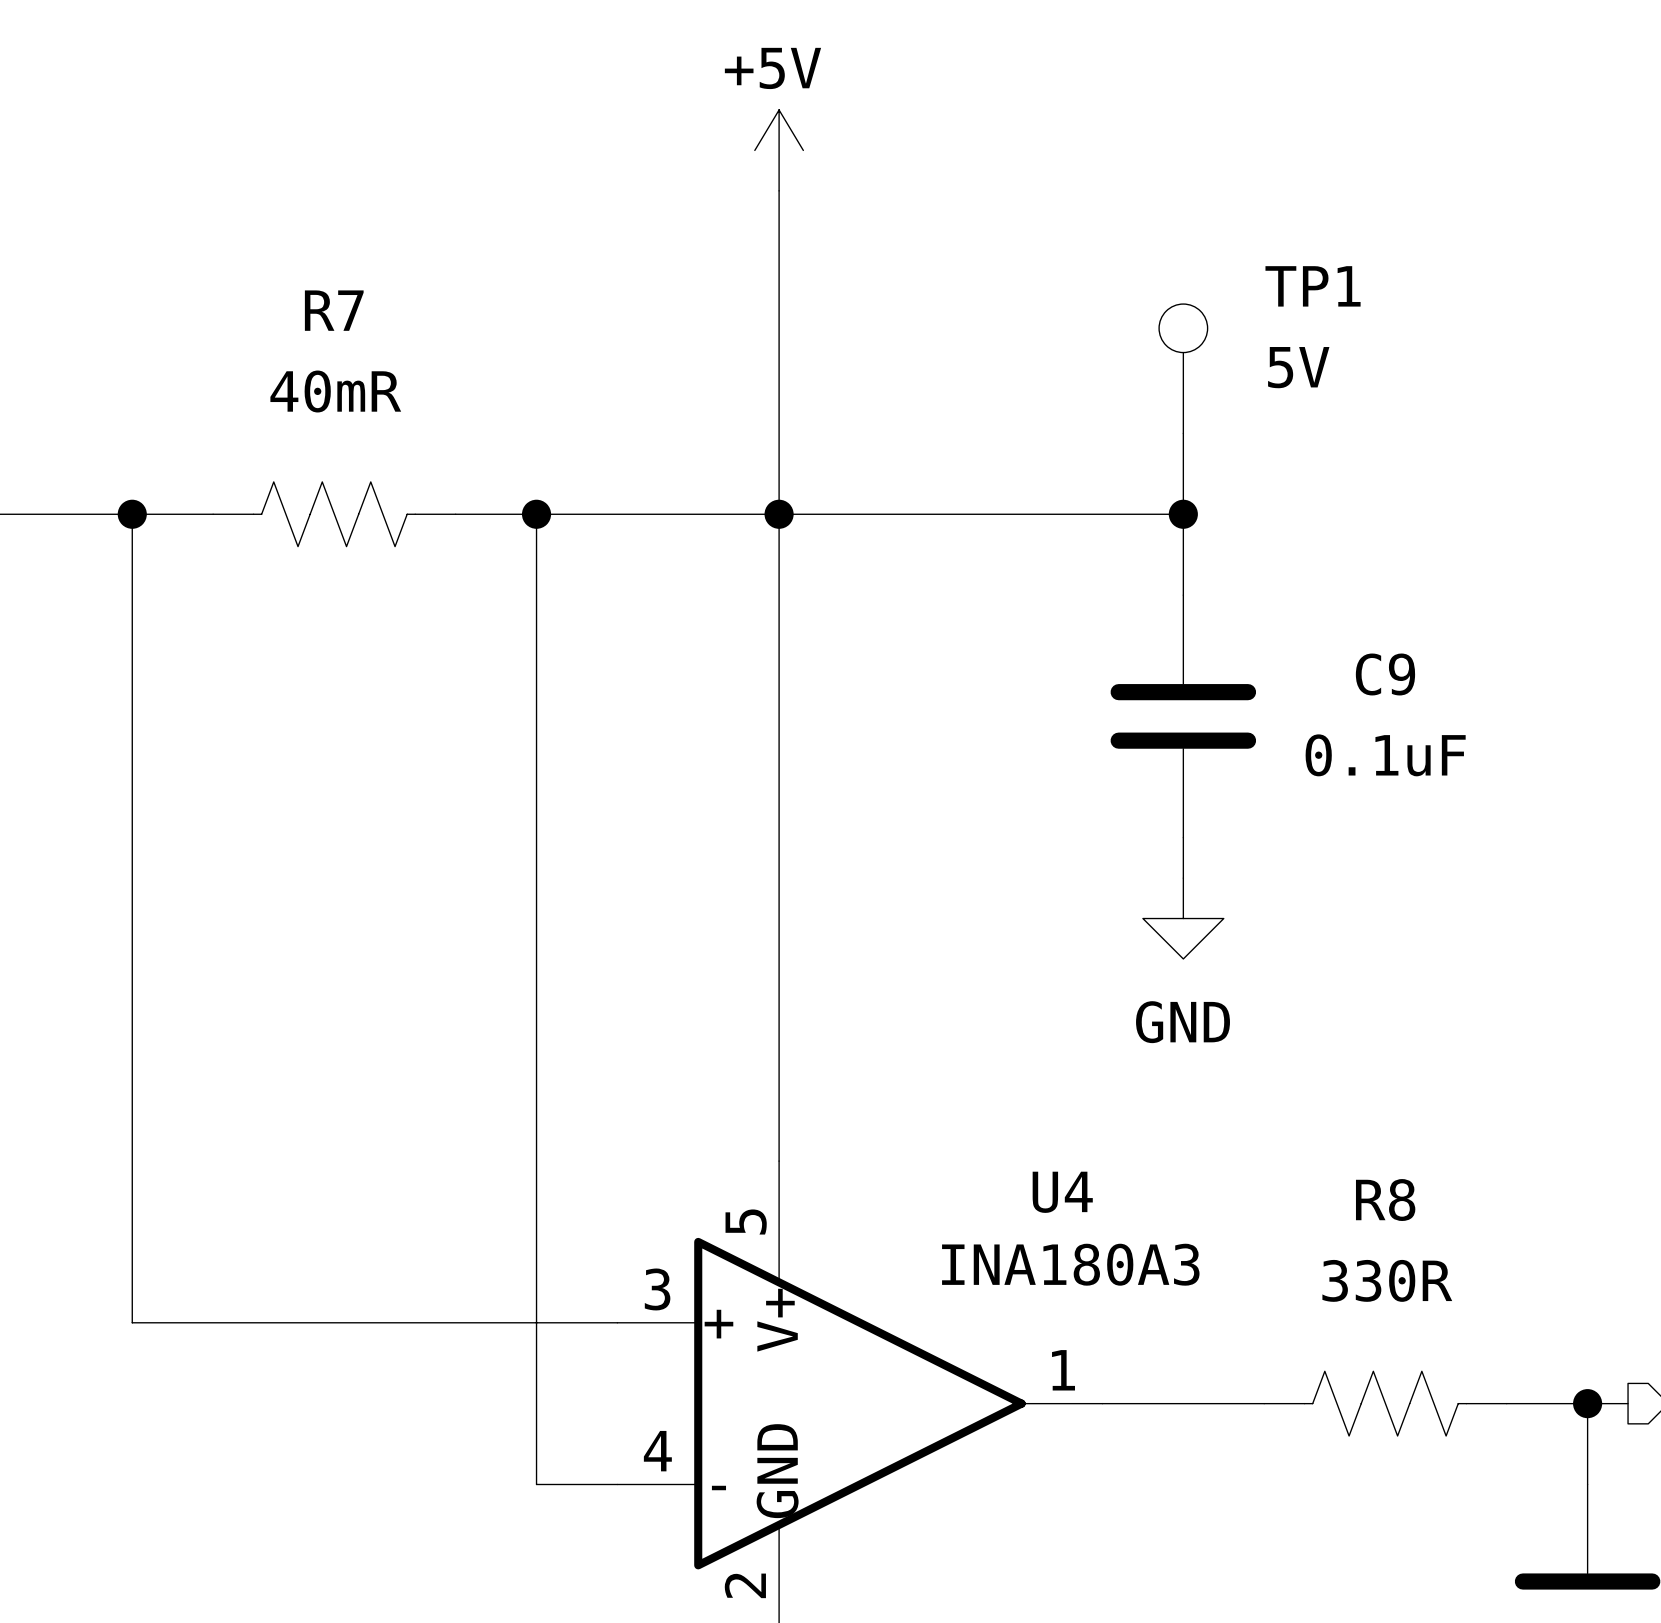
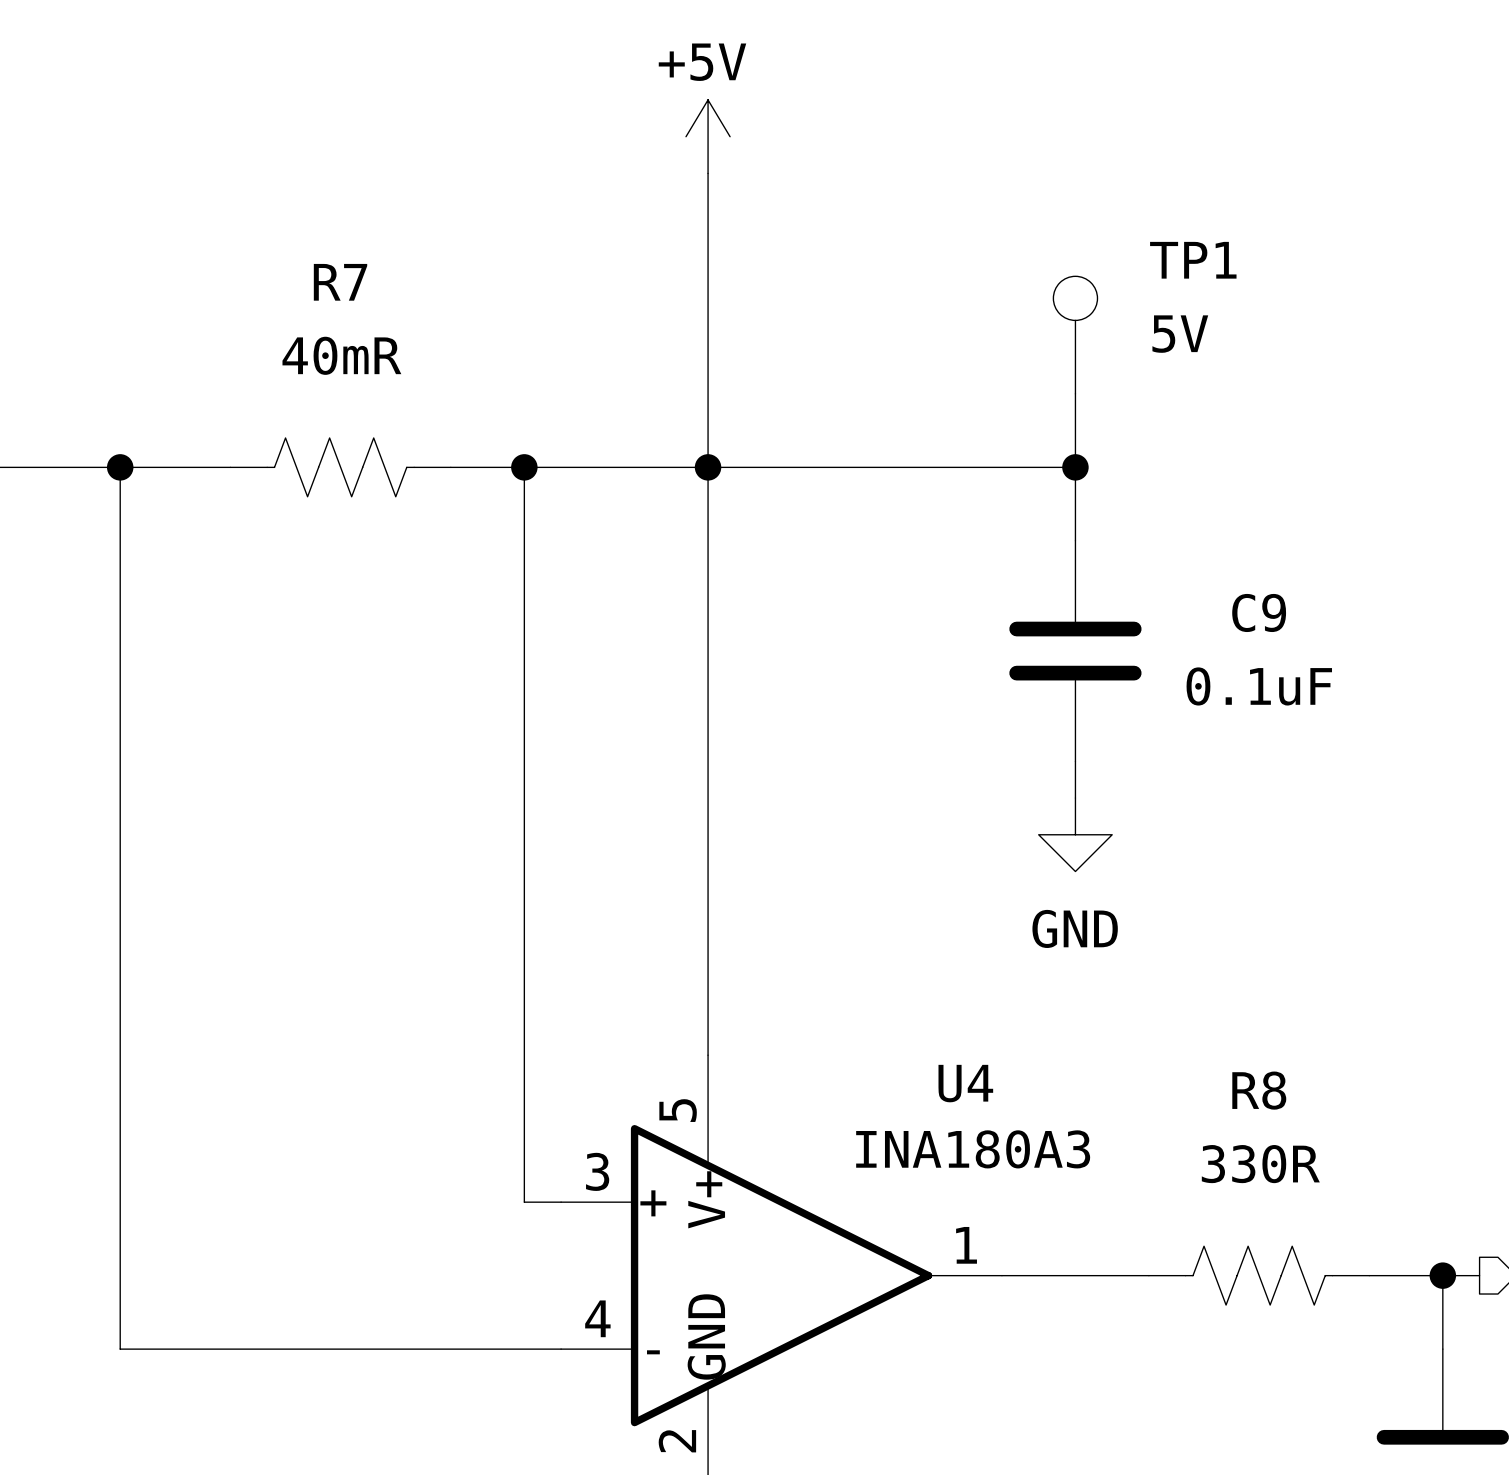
R7 position: (334, 514) -> (340, 467)
wire: (536, 514) (536, 1484) -> none
junction position: (536, 514) -> (524, 467)
wire: none -> (524, 467) (524, 1202)
wire: (132, 1322) (576, 1322) -> (120, 1202) (120, 1349) (487, 1349)

